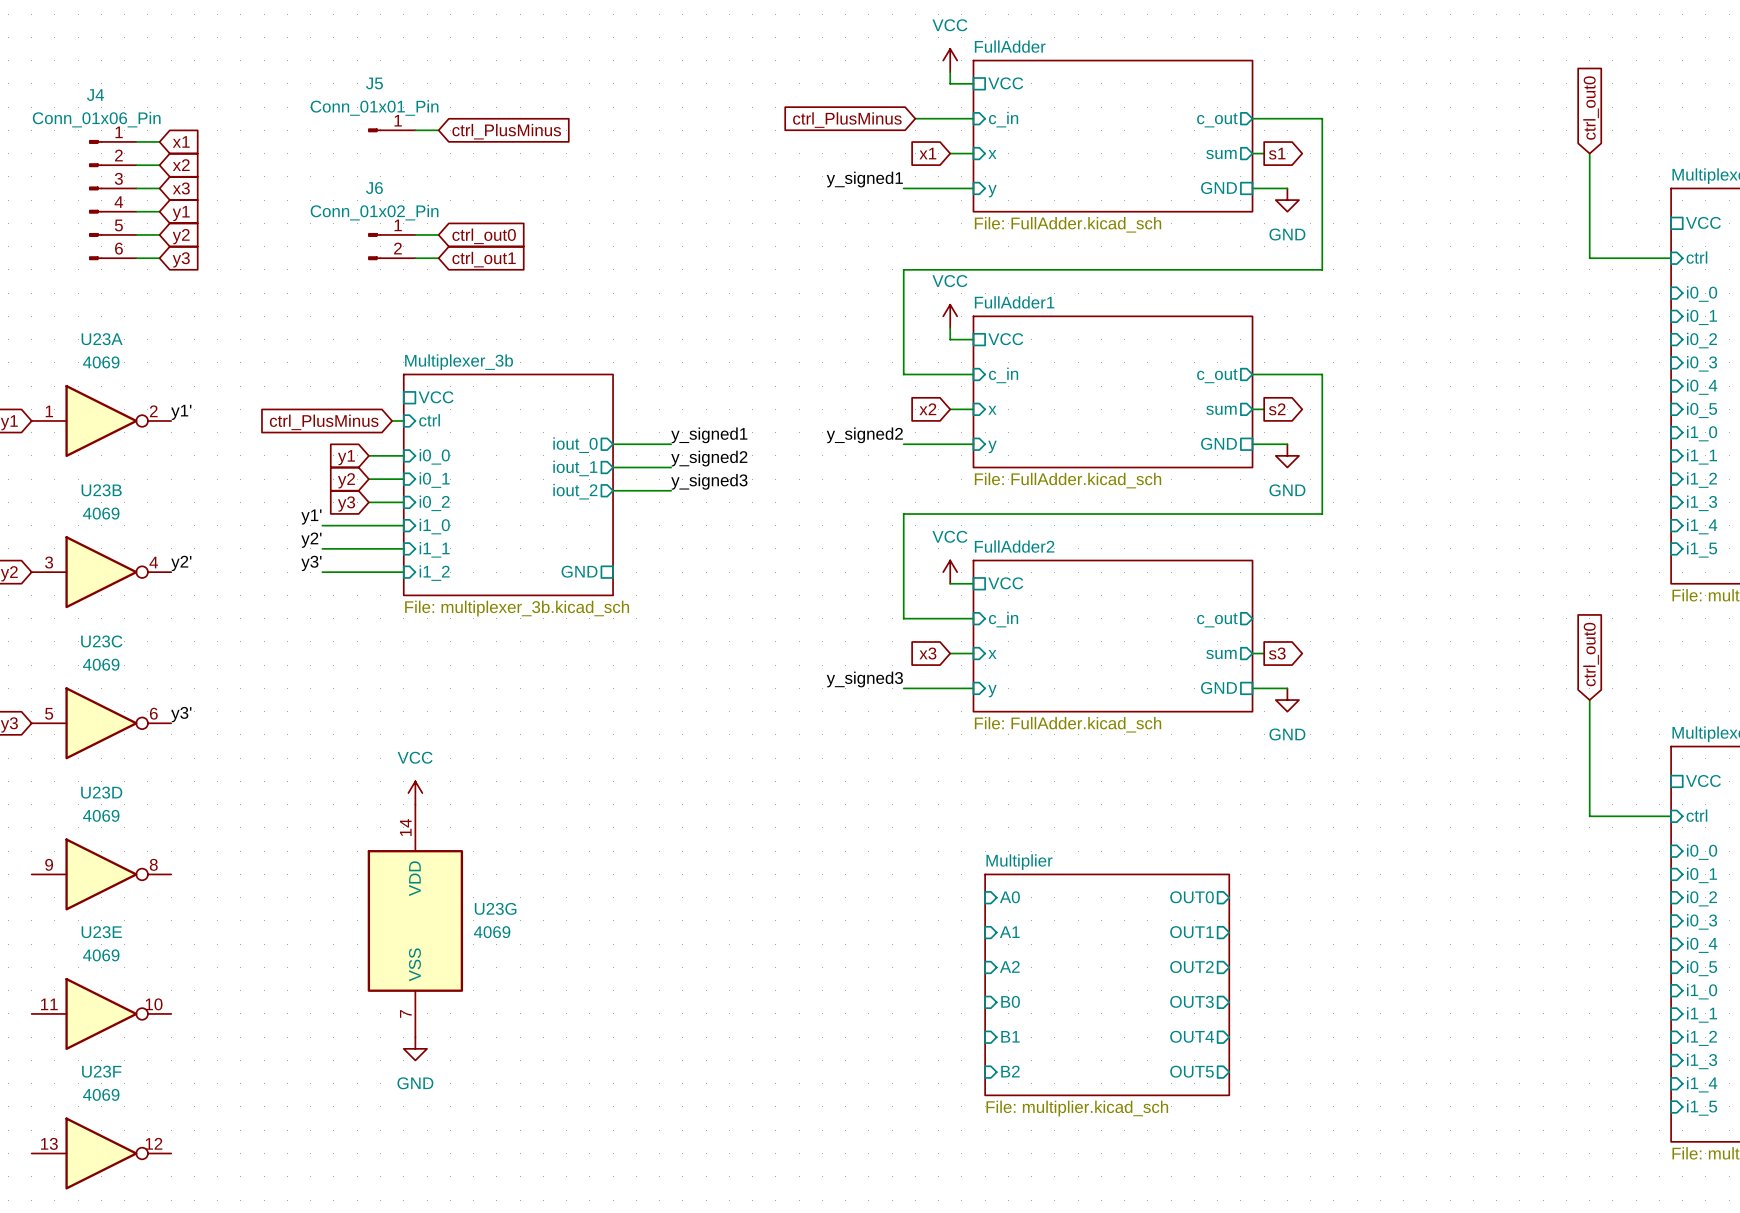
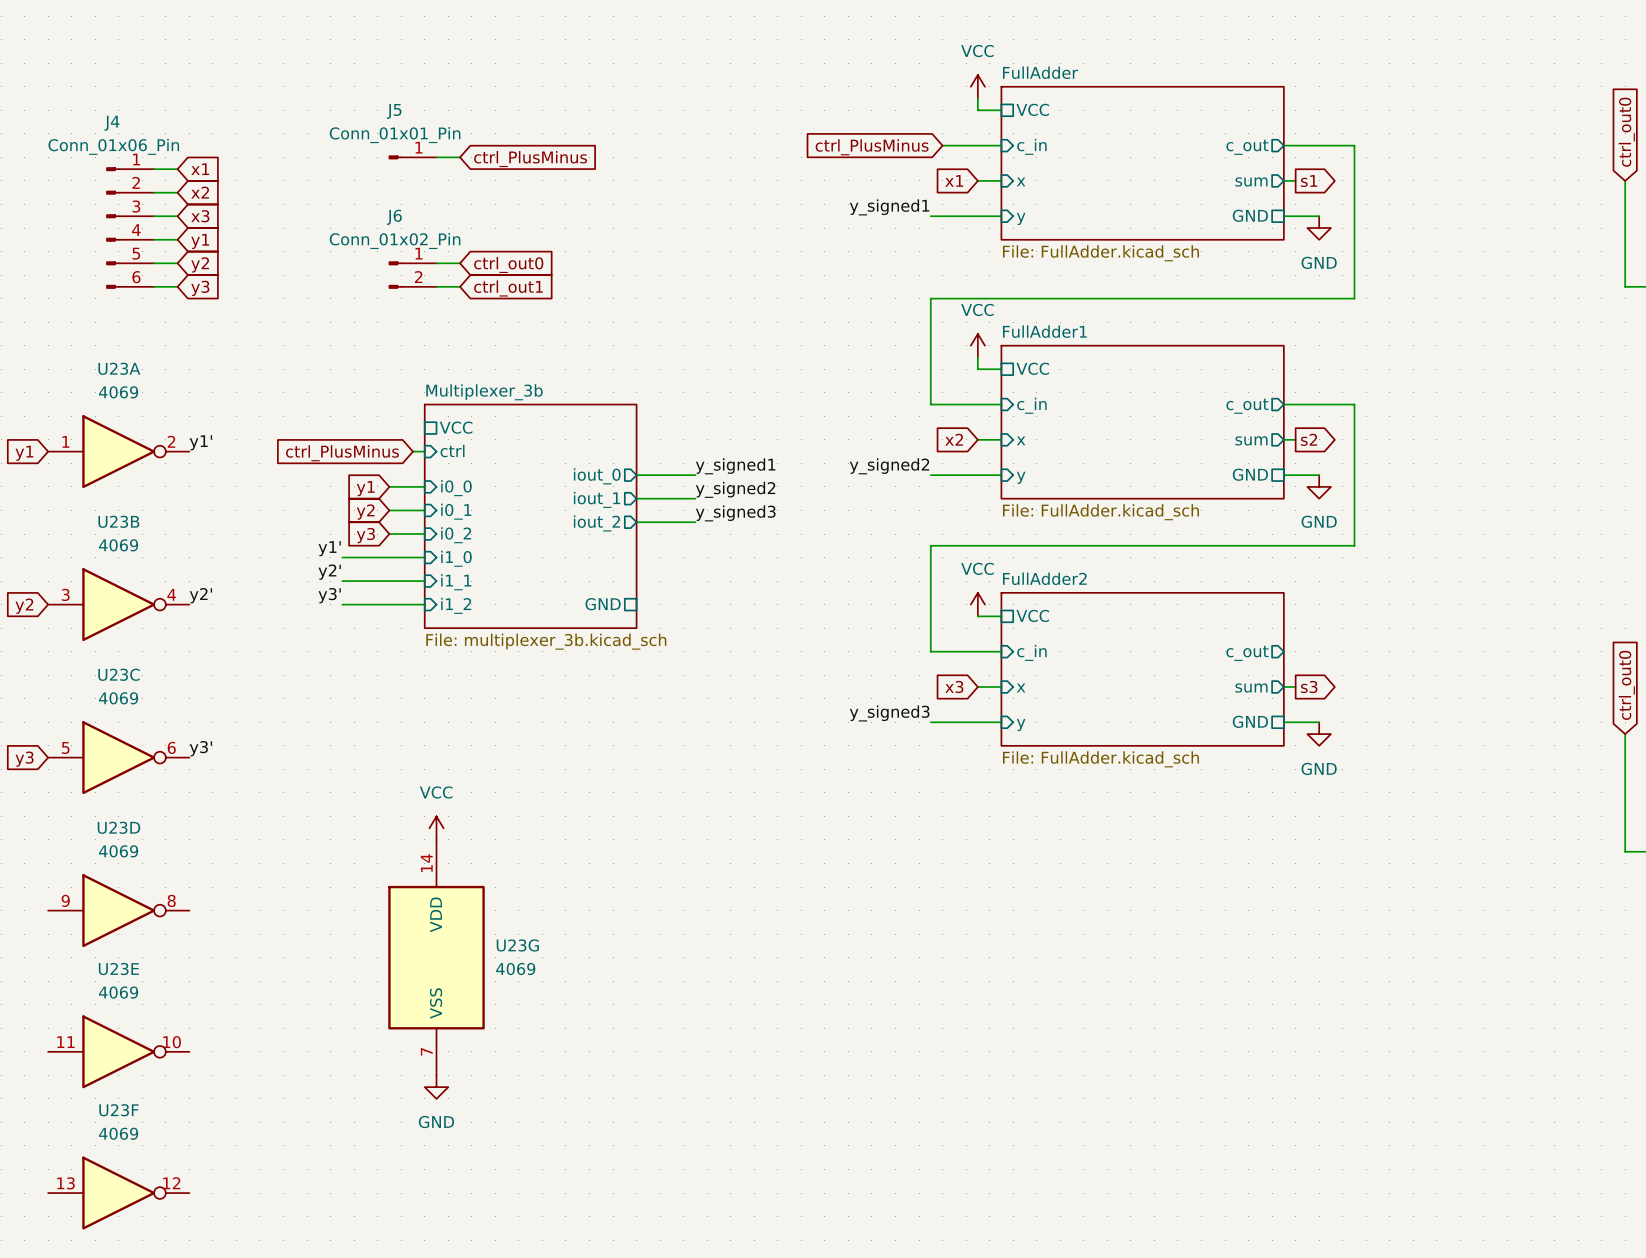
sheet pin: A0 (1009, 897) -> none
sheet pin: OUT0 (1192, 897) -> none
sheet pin: A1 (1009, 932) -> none
sheet pin: OUT1 (1191, 932) -> none
sheet pin: A2 (1009, 966) -> none
sheet pin: OUT2 (1191, 967) -> none
sheet Multiplier: File: multiplier.kicad_sch (1107, 984) -> none
sheet pin: B0 (1010, 1001) -> none
sheet pin: OUT3 (1191, 1001) -> none
sheet pin: B1 (1010, 1036) -> none
sheet pin: OUT4 (1192, 1036) -> none
sheet pin: B2 (1010, 1071) -> none
sheet pin: OUT5 (1192, 1071) -> none

